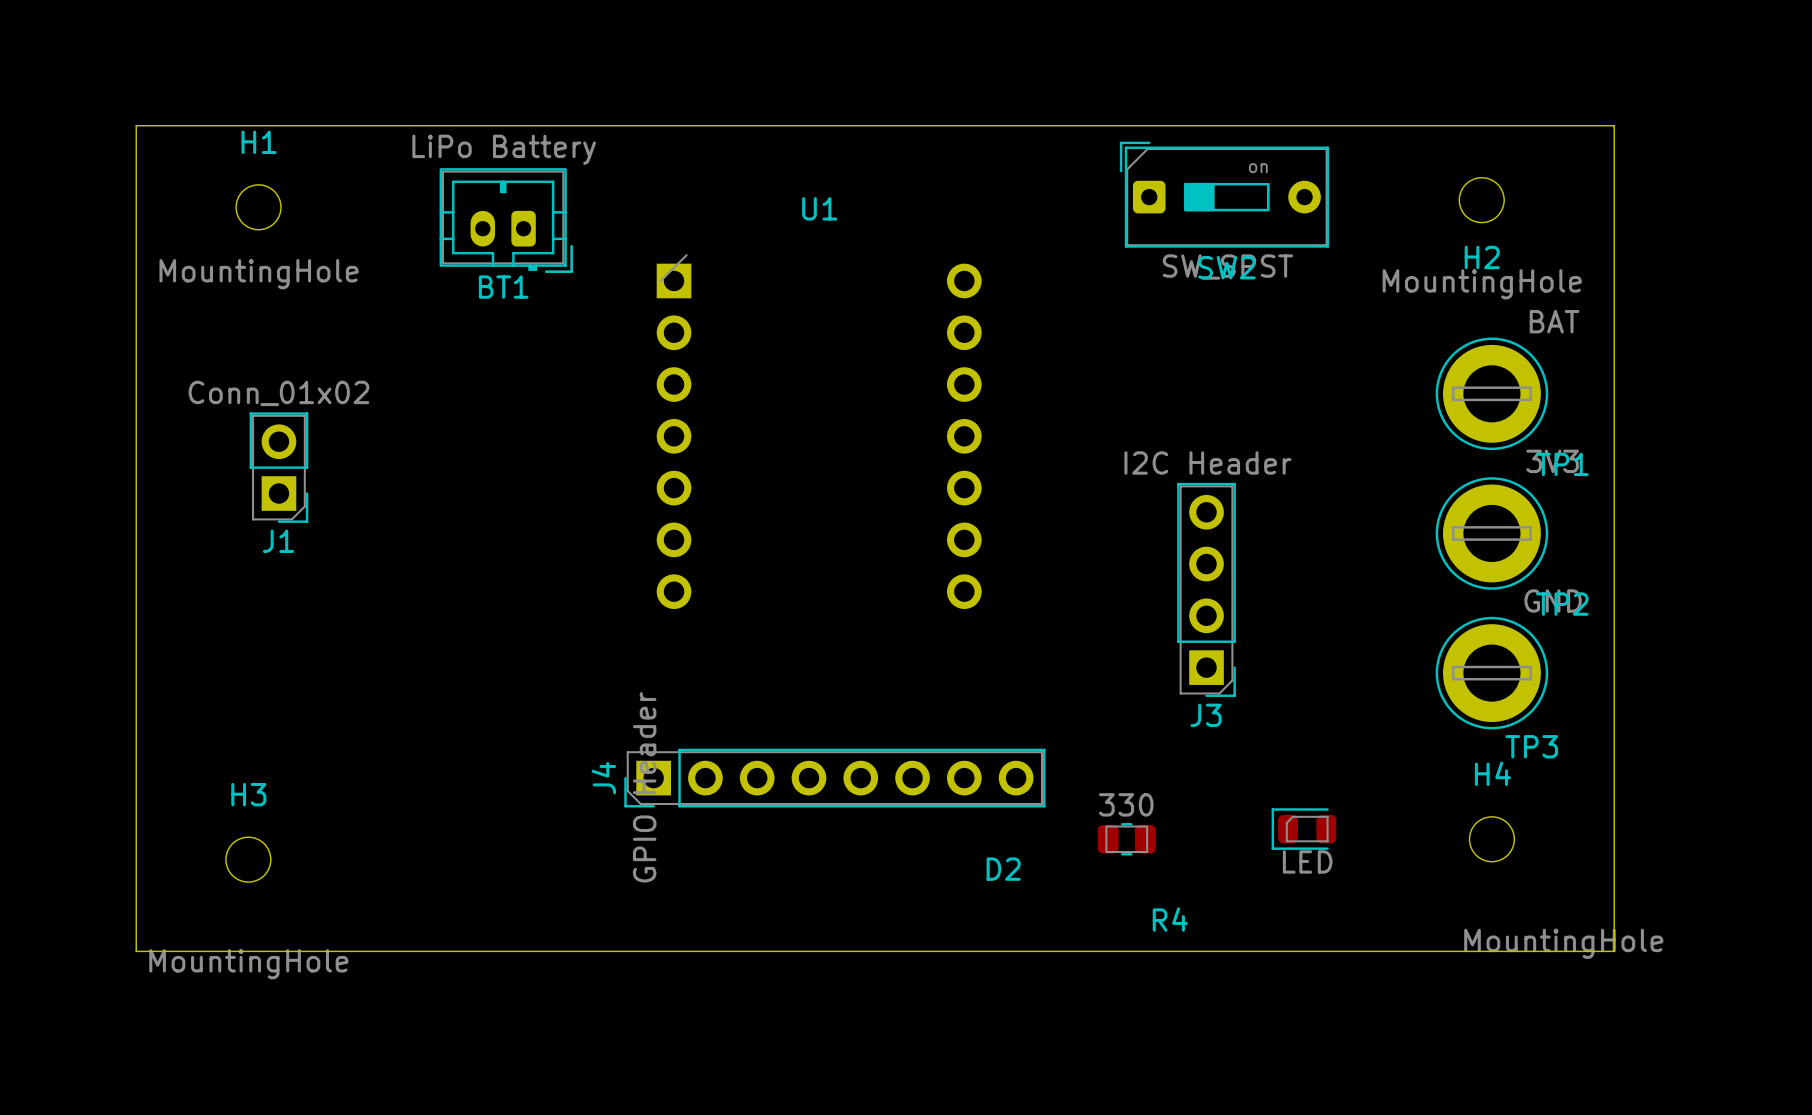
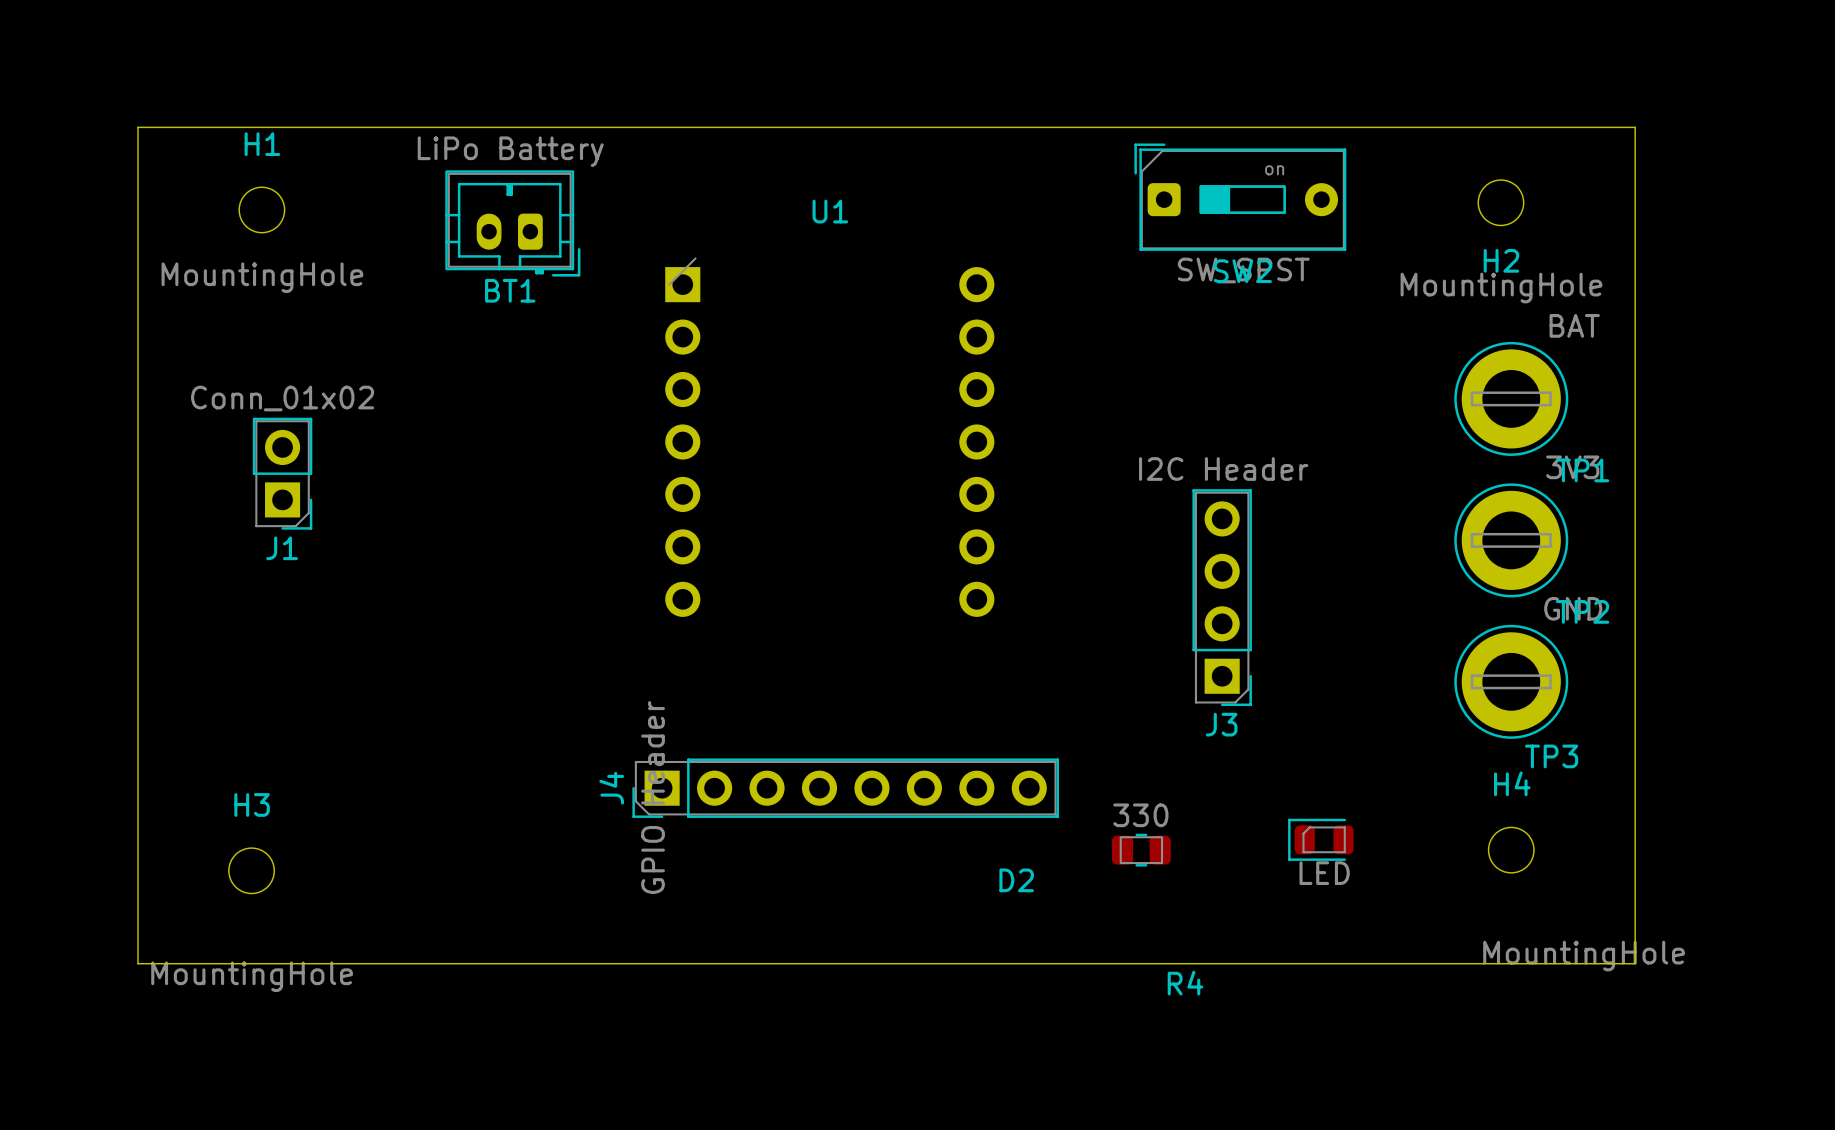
R4 name position: R4 (1170, 919) -> R4 (1185, 983)

